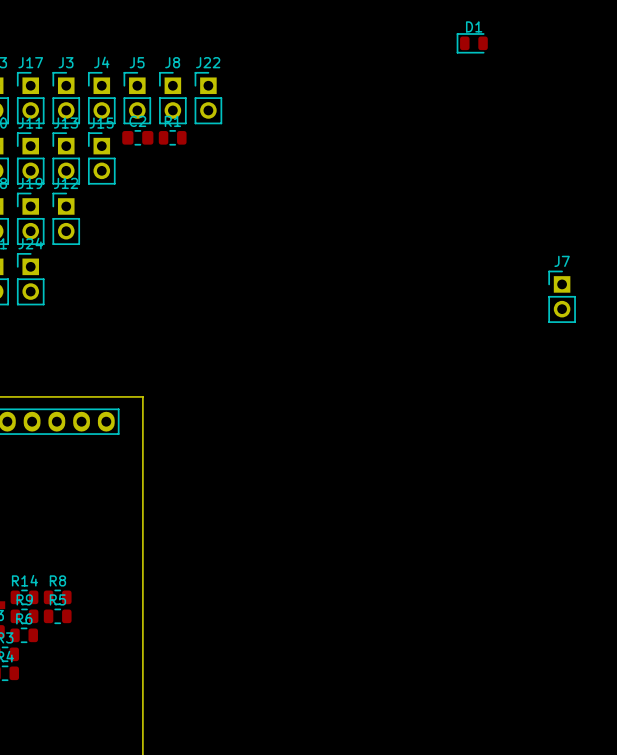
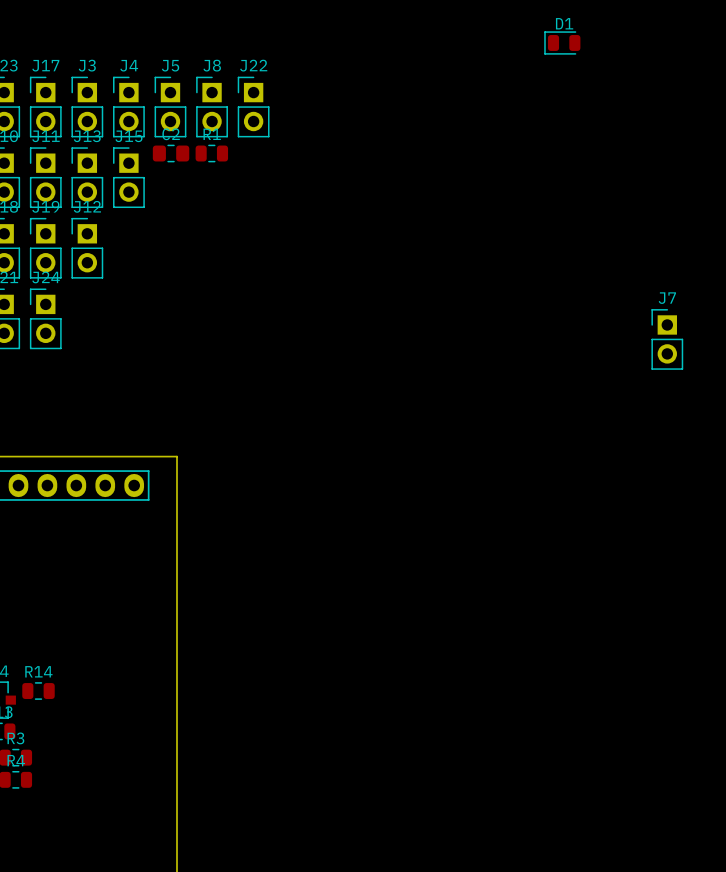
R8: (57, 597) -> none
R9: (24, 616) -> none
R5: (57, 616) -> none
R6: (24, 635) -> none

